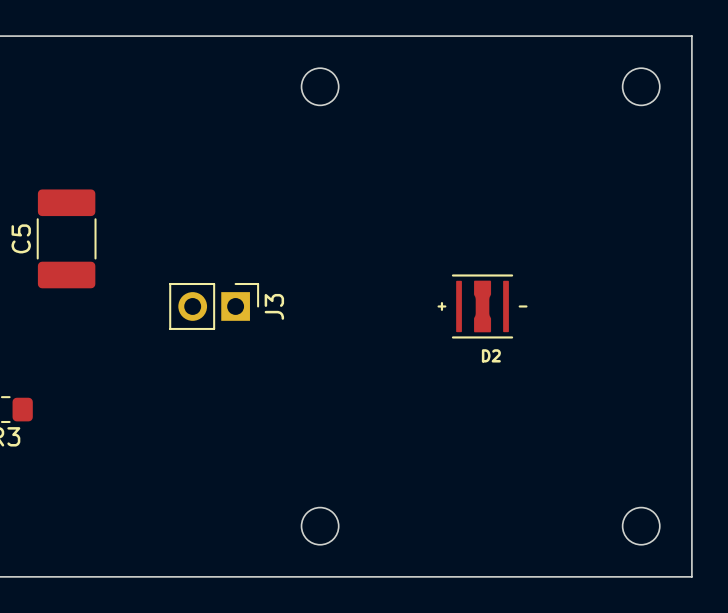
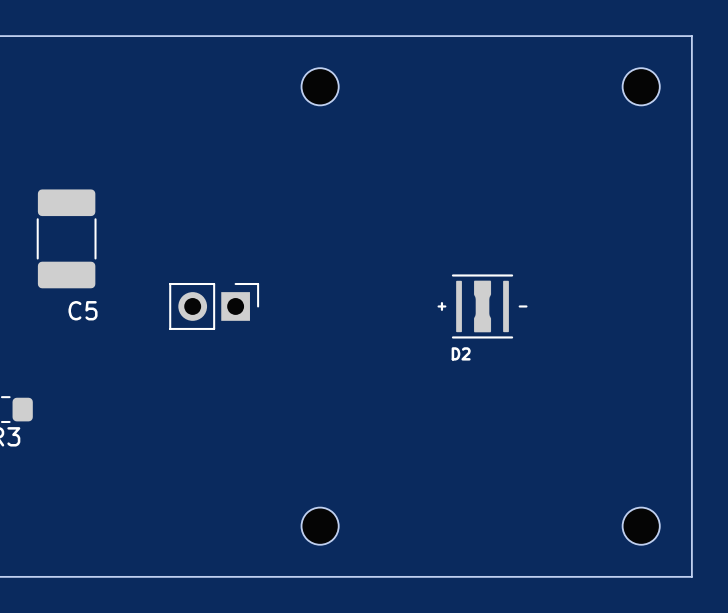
C5 name rotation: 0° (21, 238) -> 90° clockwise (83, 310)
C5 name position: C5 (21, 238) -> C5 (83, 310)
J3 name: J3 (274, 306) -> none
D2 name position: D2 (491, 355) -> D2 (461, 353)

